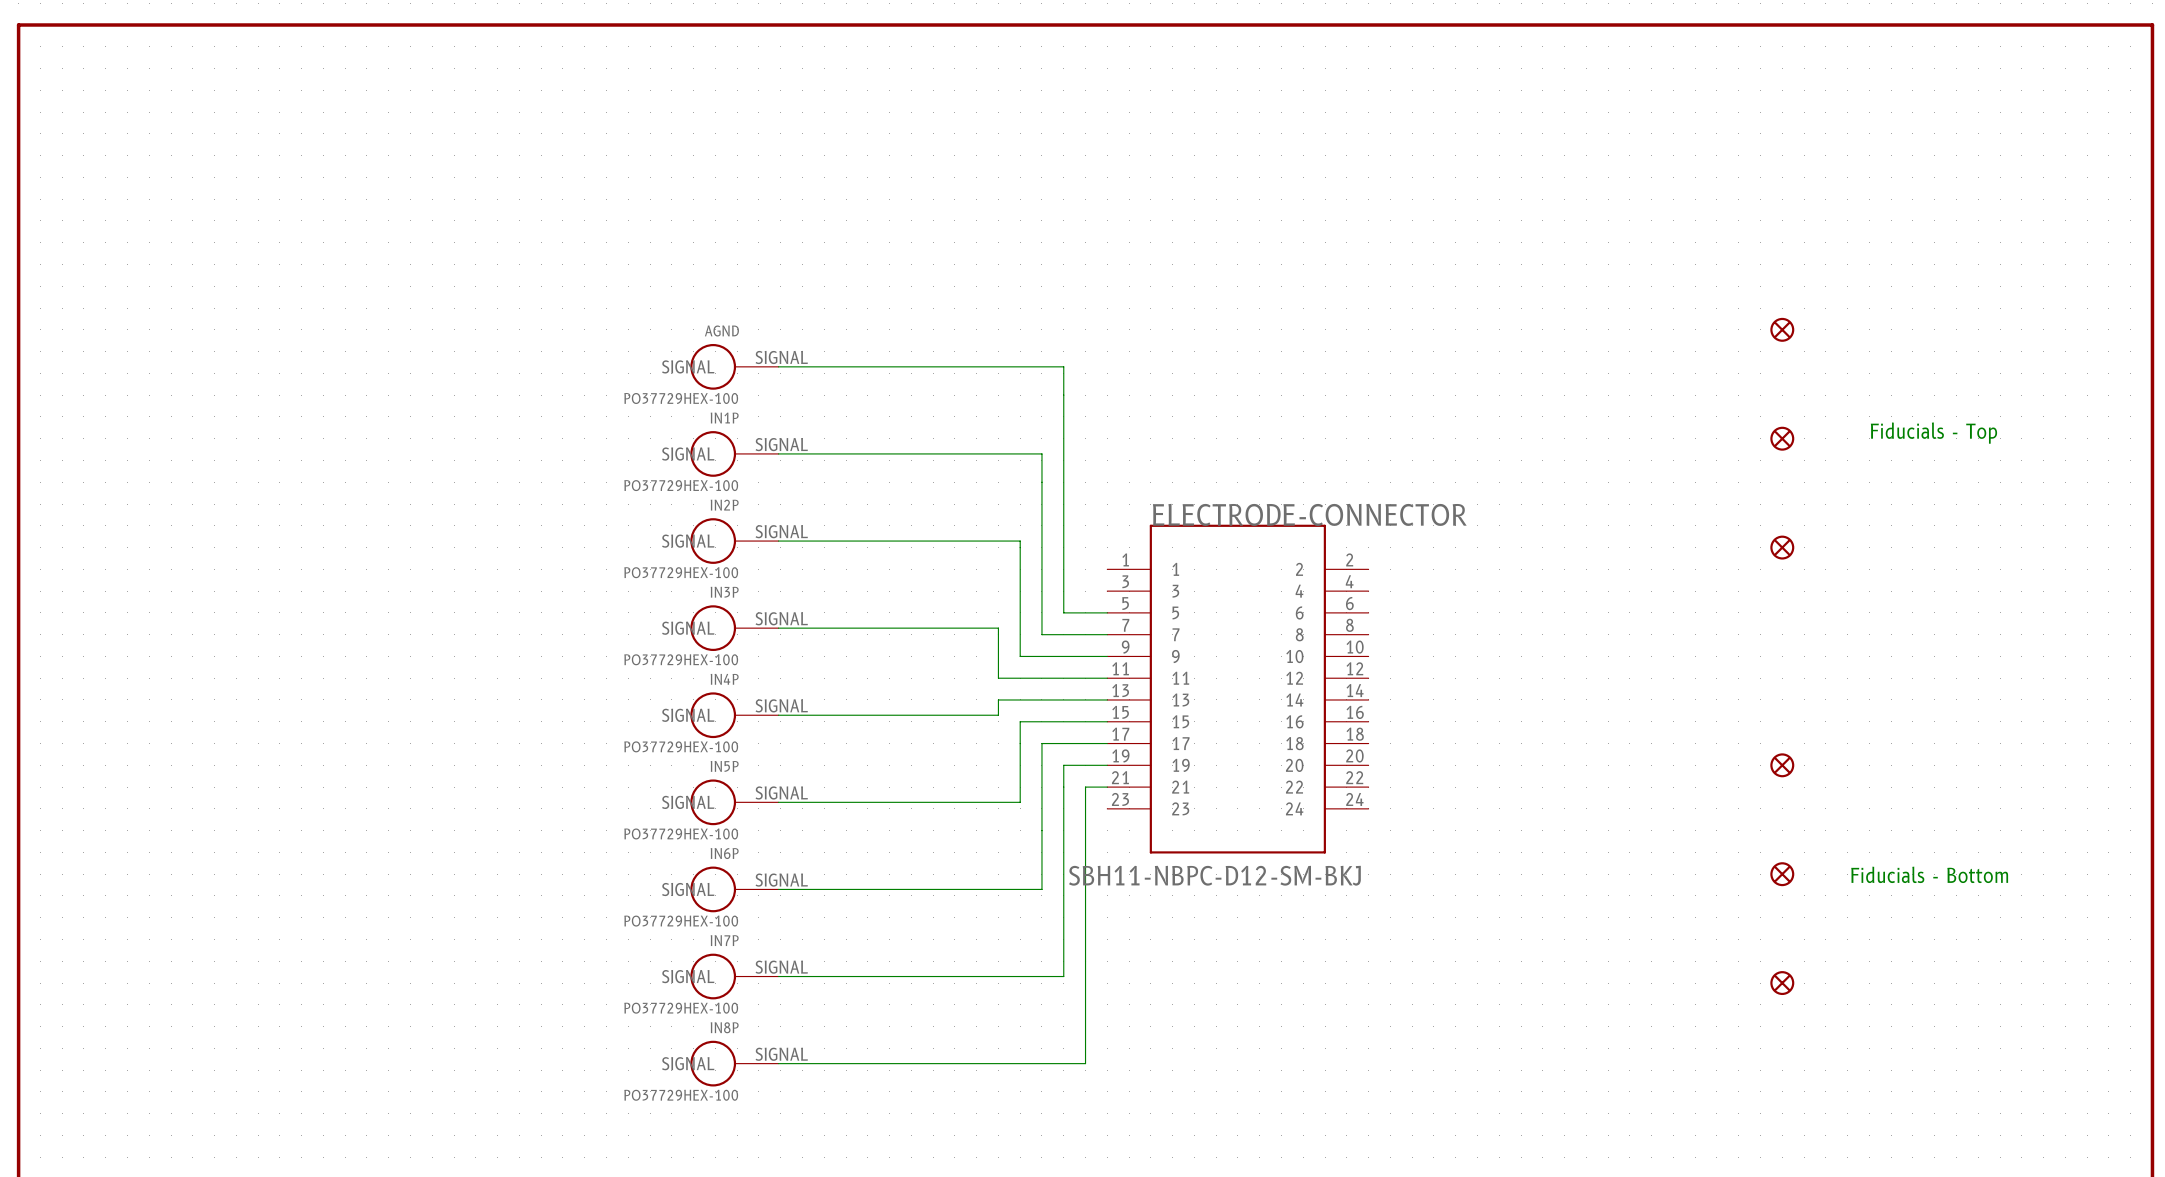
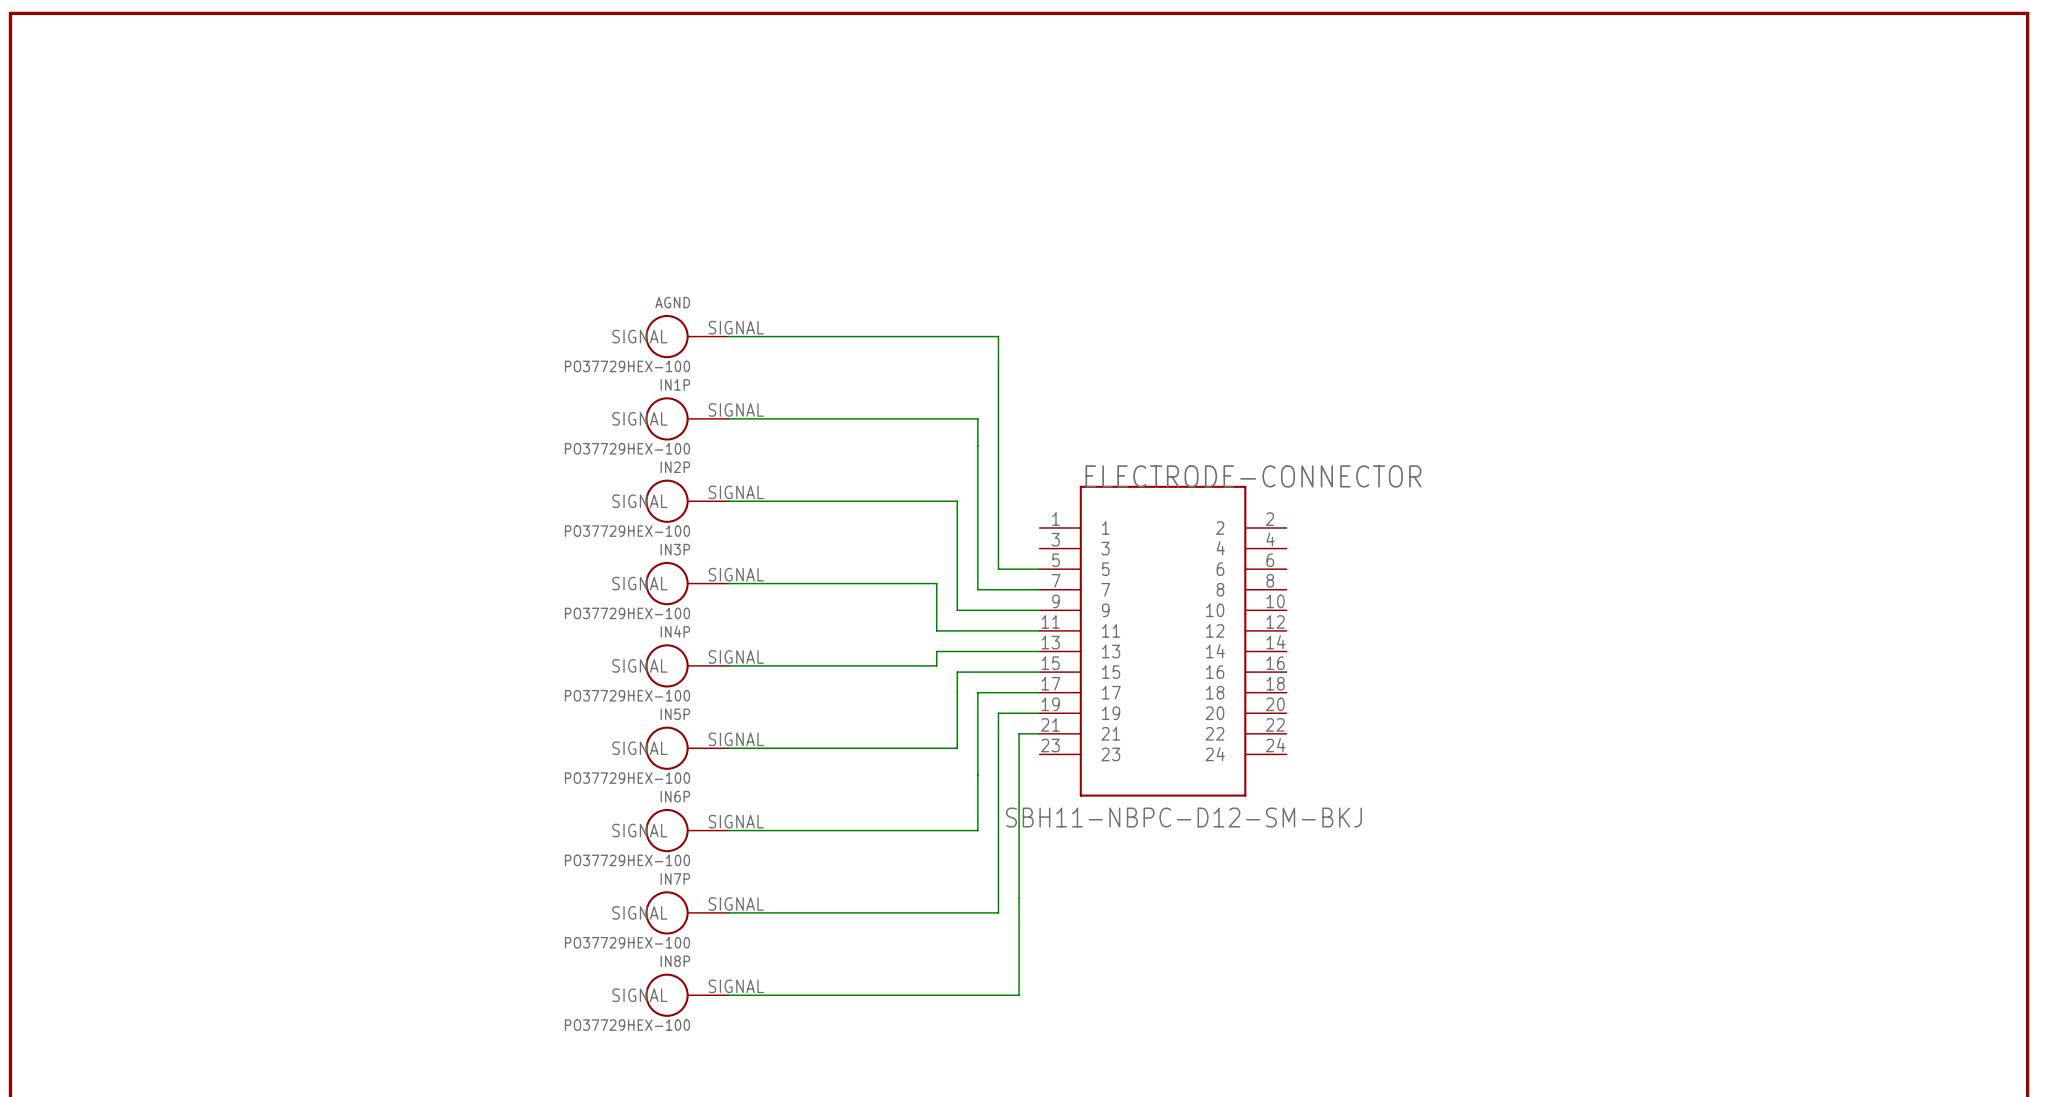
part: (1782, 329) -> none
text: Fiducials - Top (1933, 433) -> none
part: (1782, 438) -> none
part: (1782, 547) -> none
part: (1782, 765) -> none
part: (1782, 874) -> none
text: Fiducials - Bottom (1929, 874) -> none
part: (1782, 983) -> none

